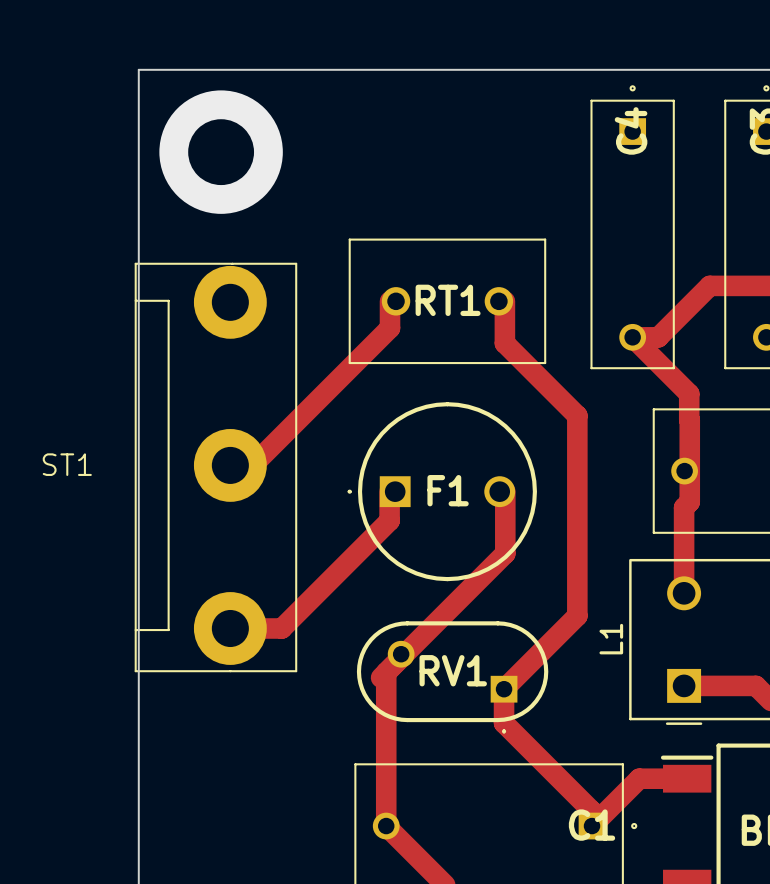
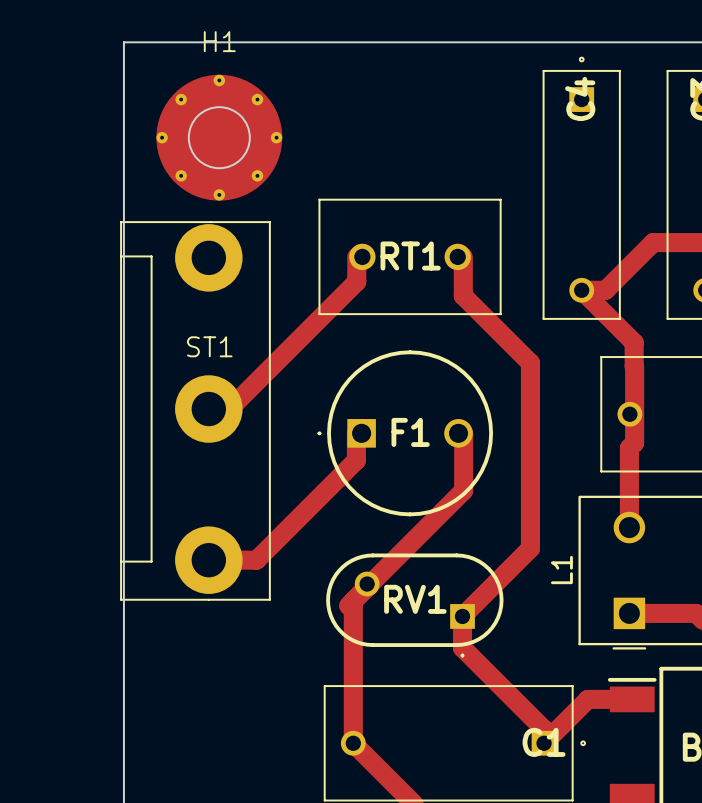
via: (221, 152) -> none
H1: none -> (219, 137)
ST1 name position: ST1 (67, 464) -> ST1 (209, 346)

